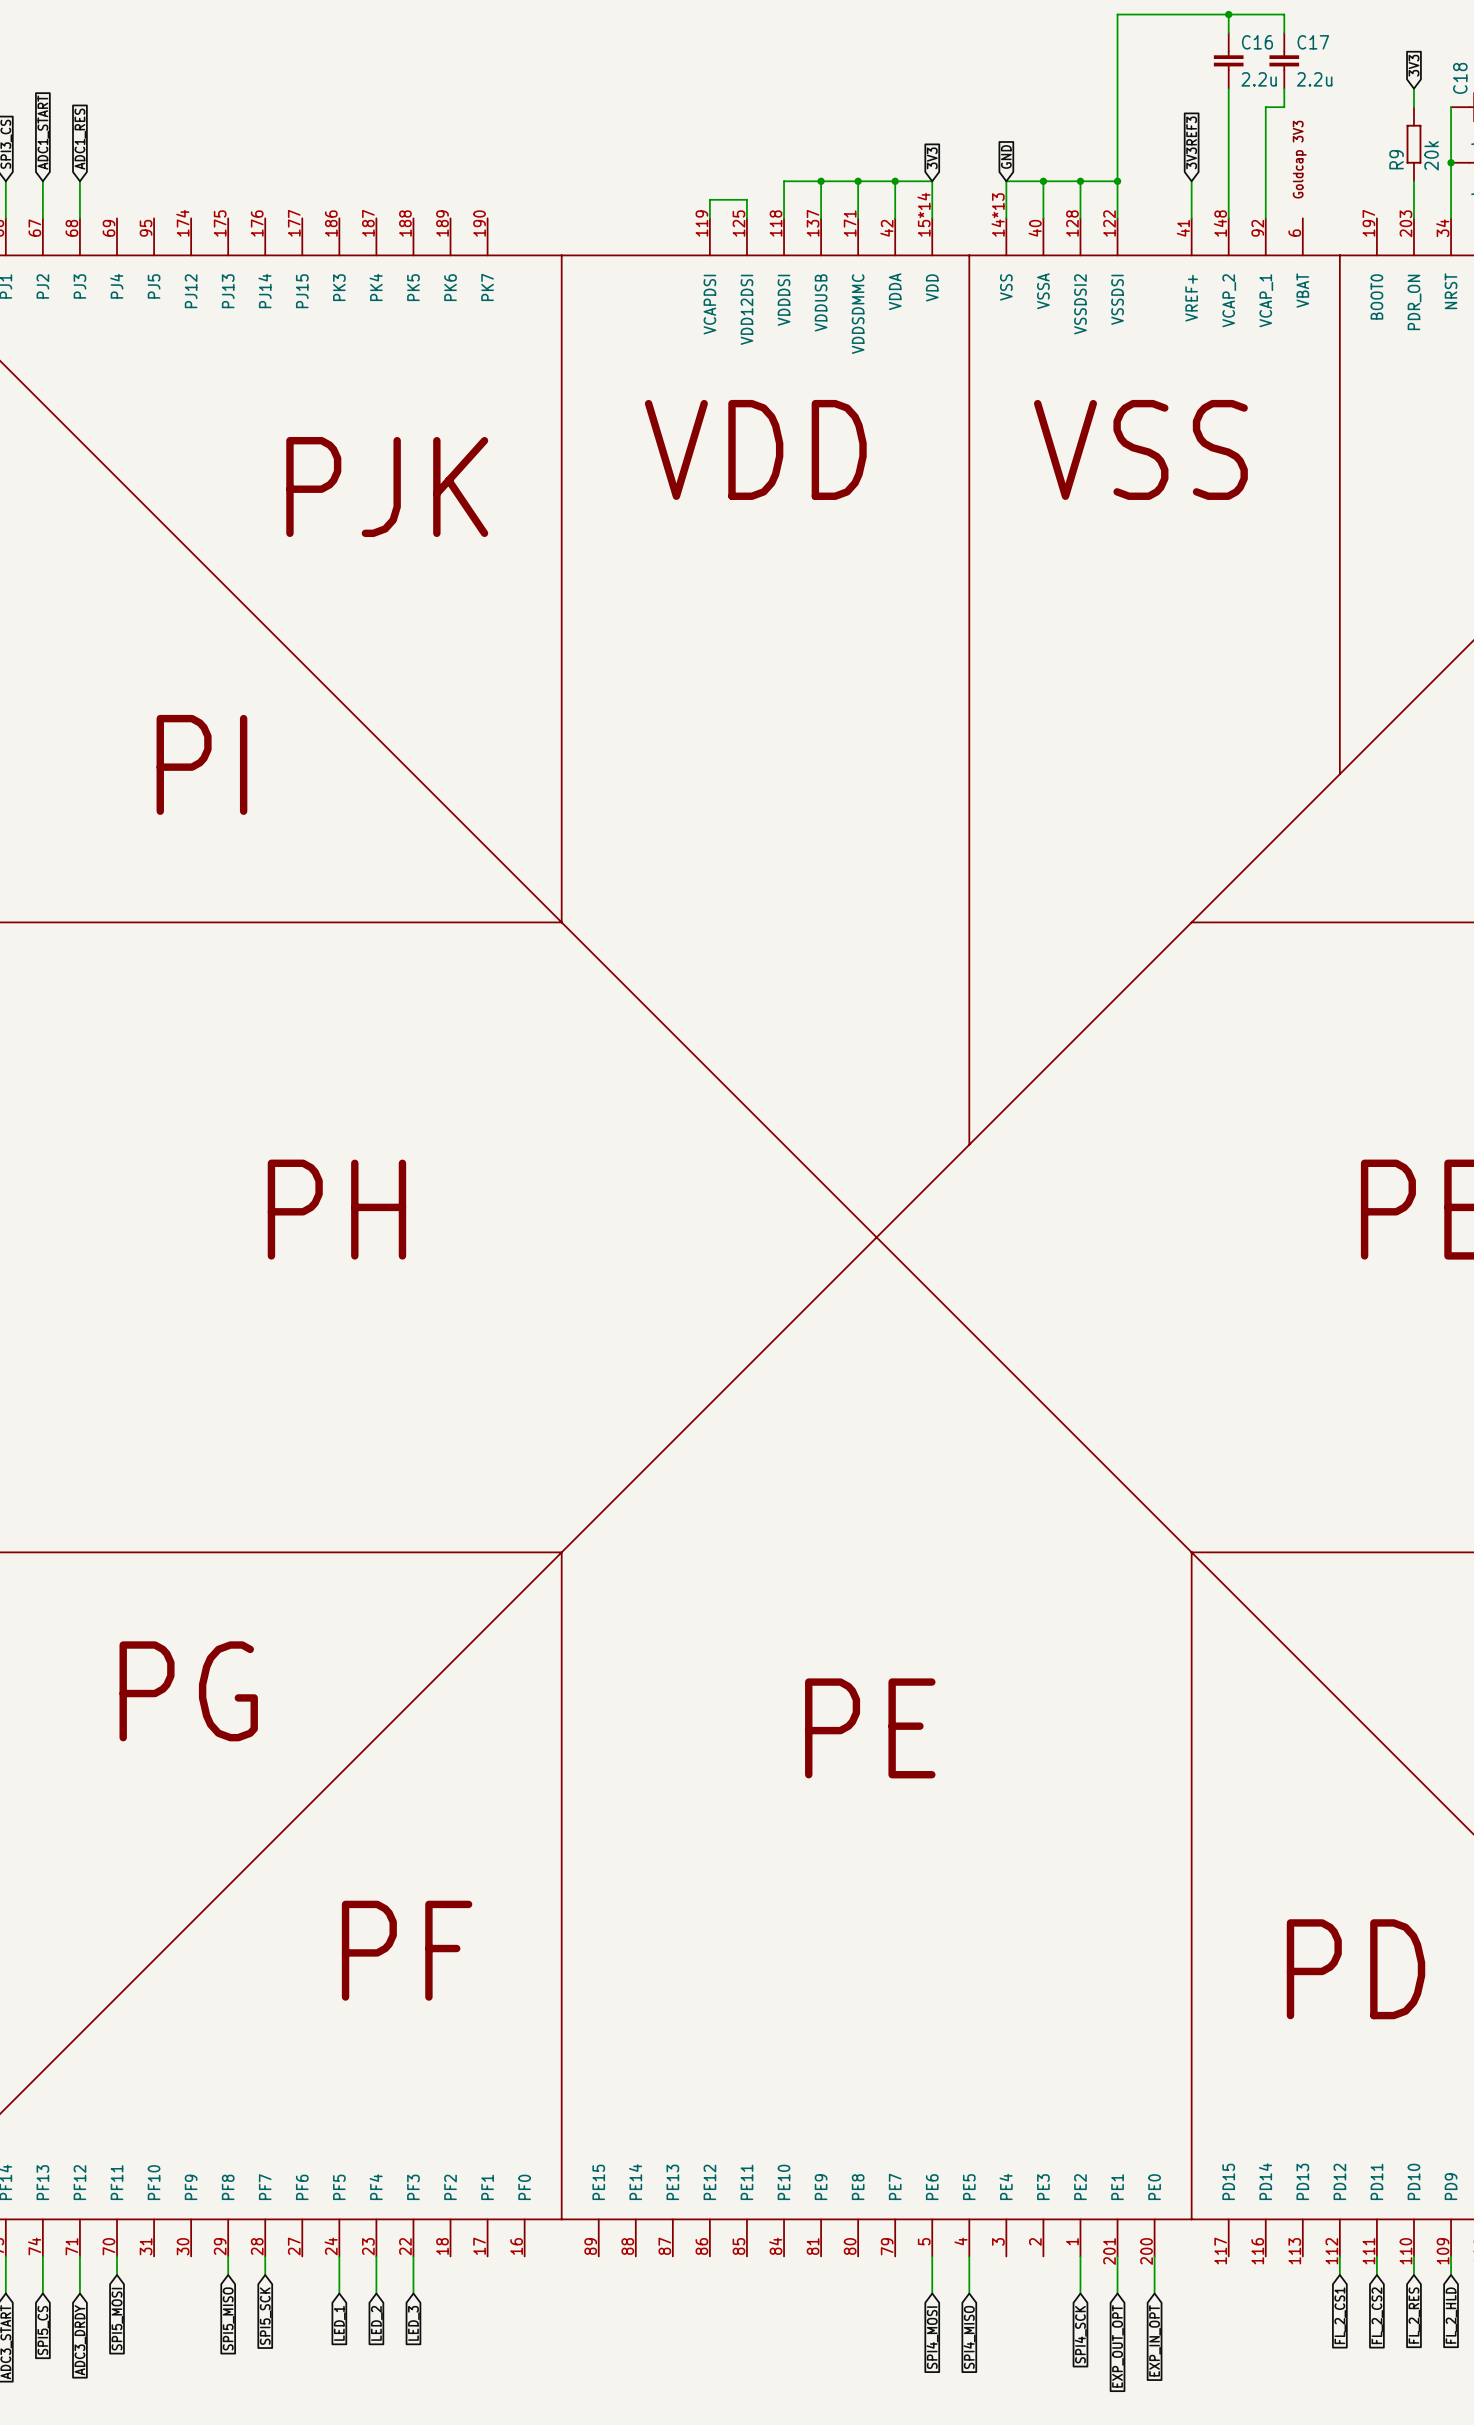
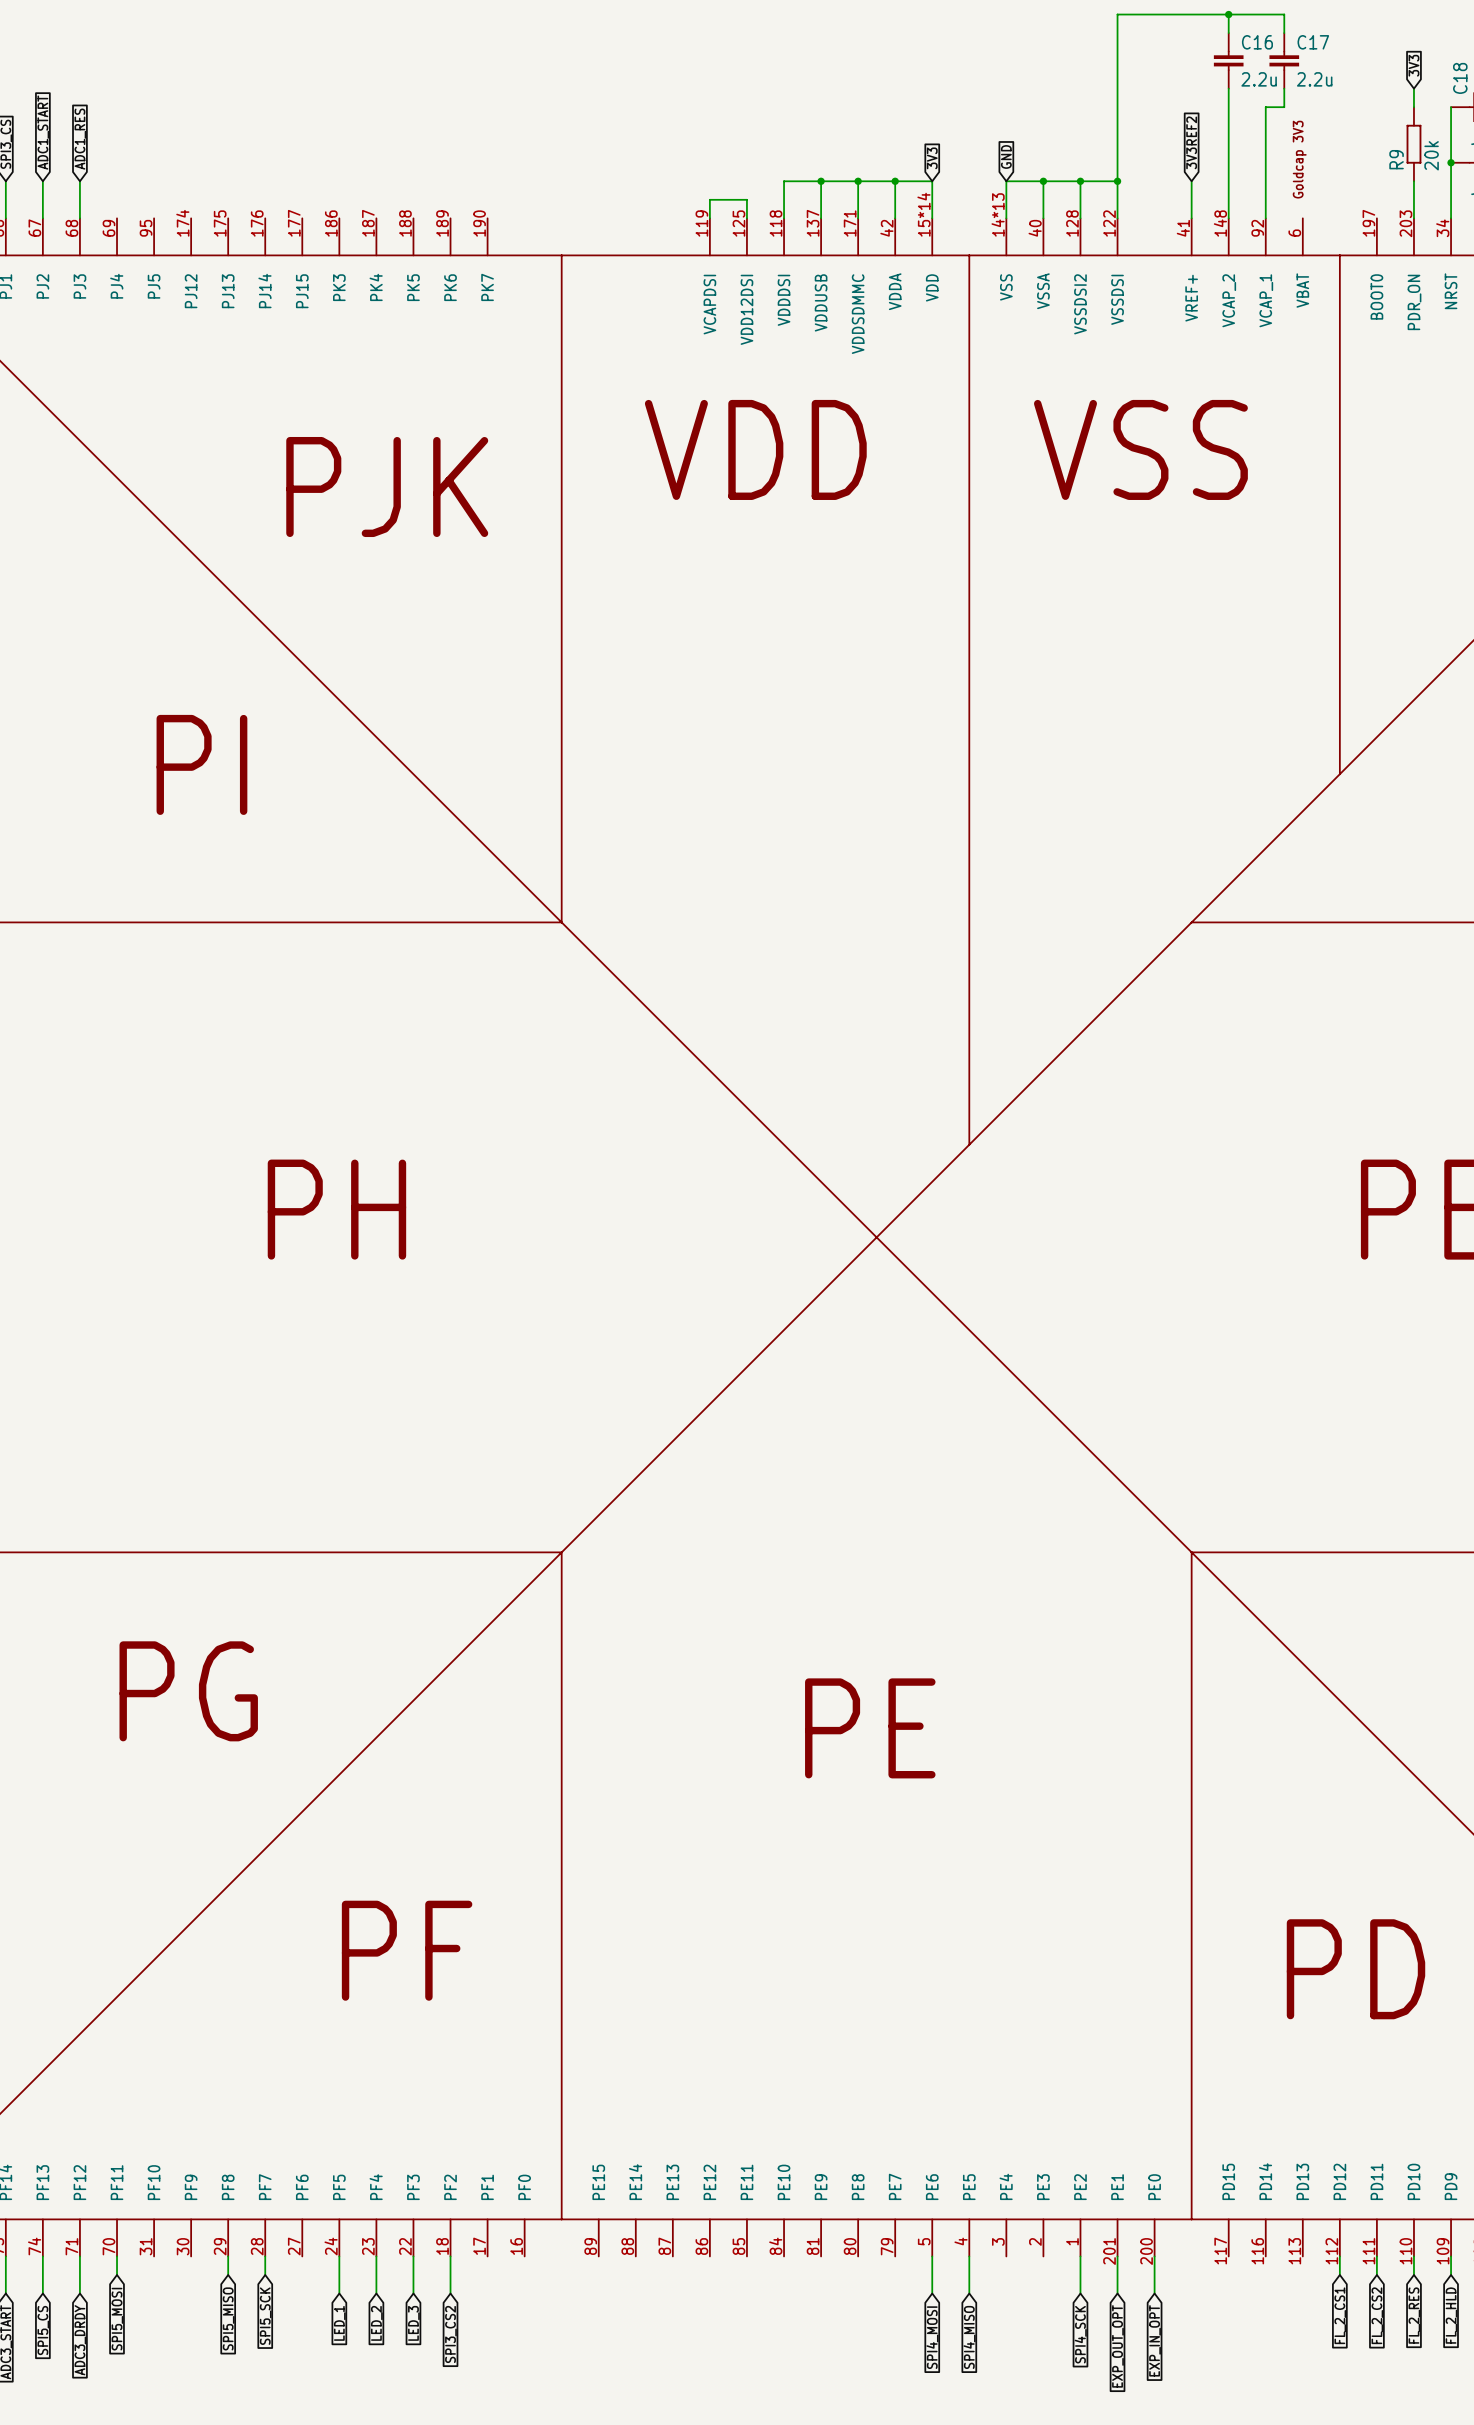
global label: 3V3REF3 (1191, 142) -> 3V3REF2 (1191, 142)
wire: none -> (450, 2256) (450, 2293)
global label: none -> SPI3_CS2 (450, 2334)

